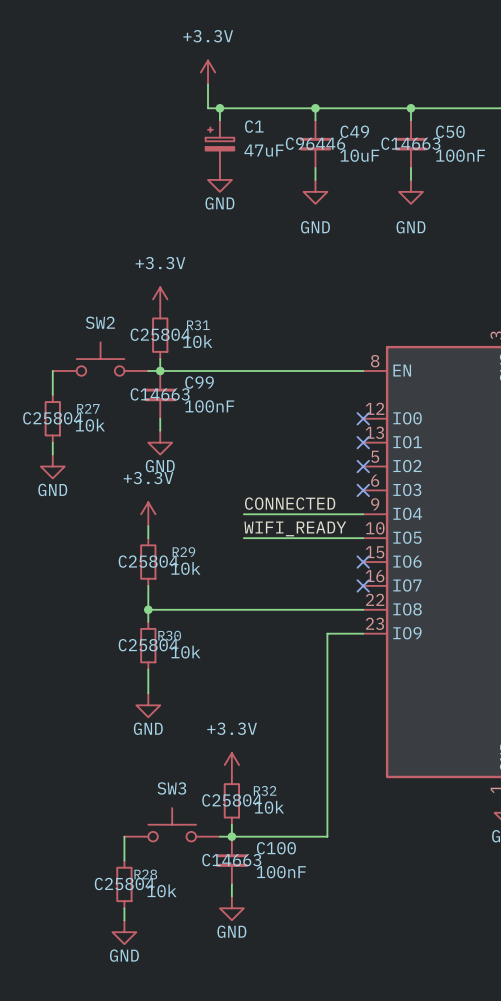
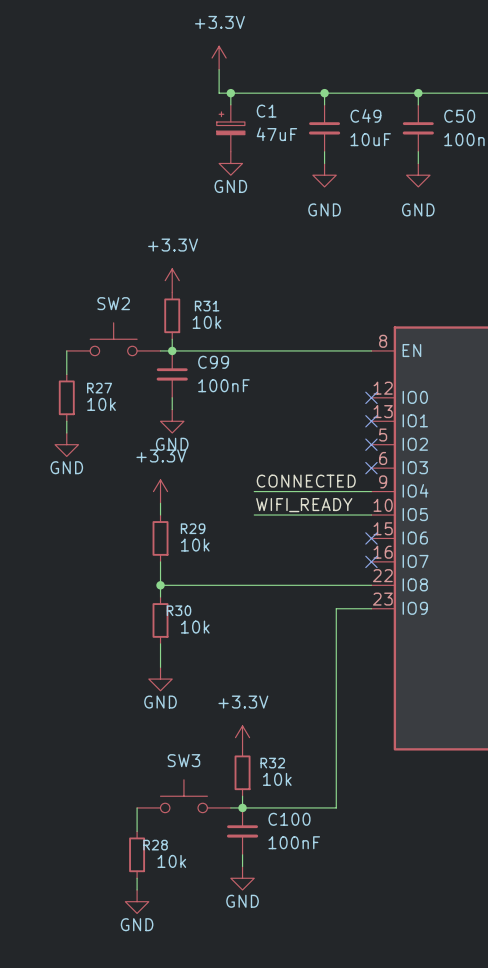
C49 text: C96446 (315, 143) -> none
C50 text: C14663 (410, 143) -> none
R31 text: C25804 (160, 334) -> none
C99 text: C14663 (160, 394) -> none
R27 text: C25804 (53, 418) -> none
R29 text: C25804 (148, 561) -> none
R30 text: C25804 (148, 645) -> none
R32 text: C25804 (232, 800) -> none
C100 text: C14663 (231, 860) -> none
R28 text: C25804 (124, 883) -> none

